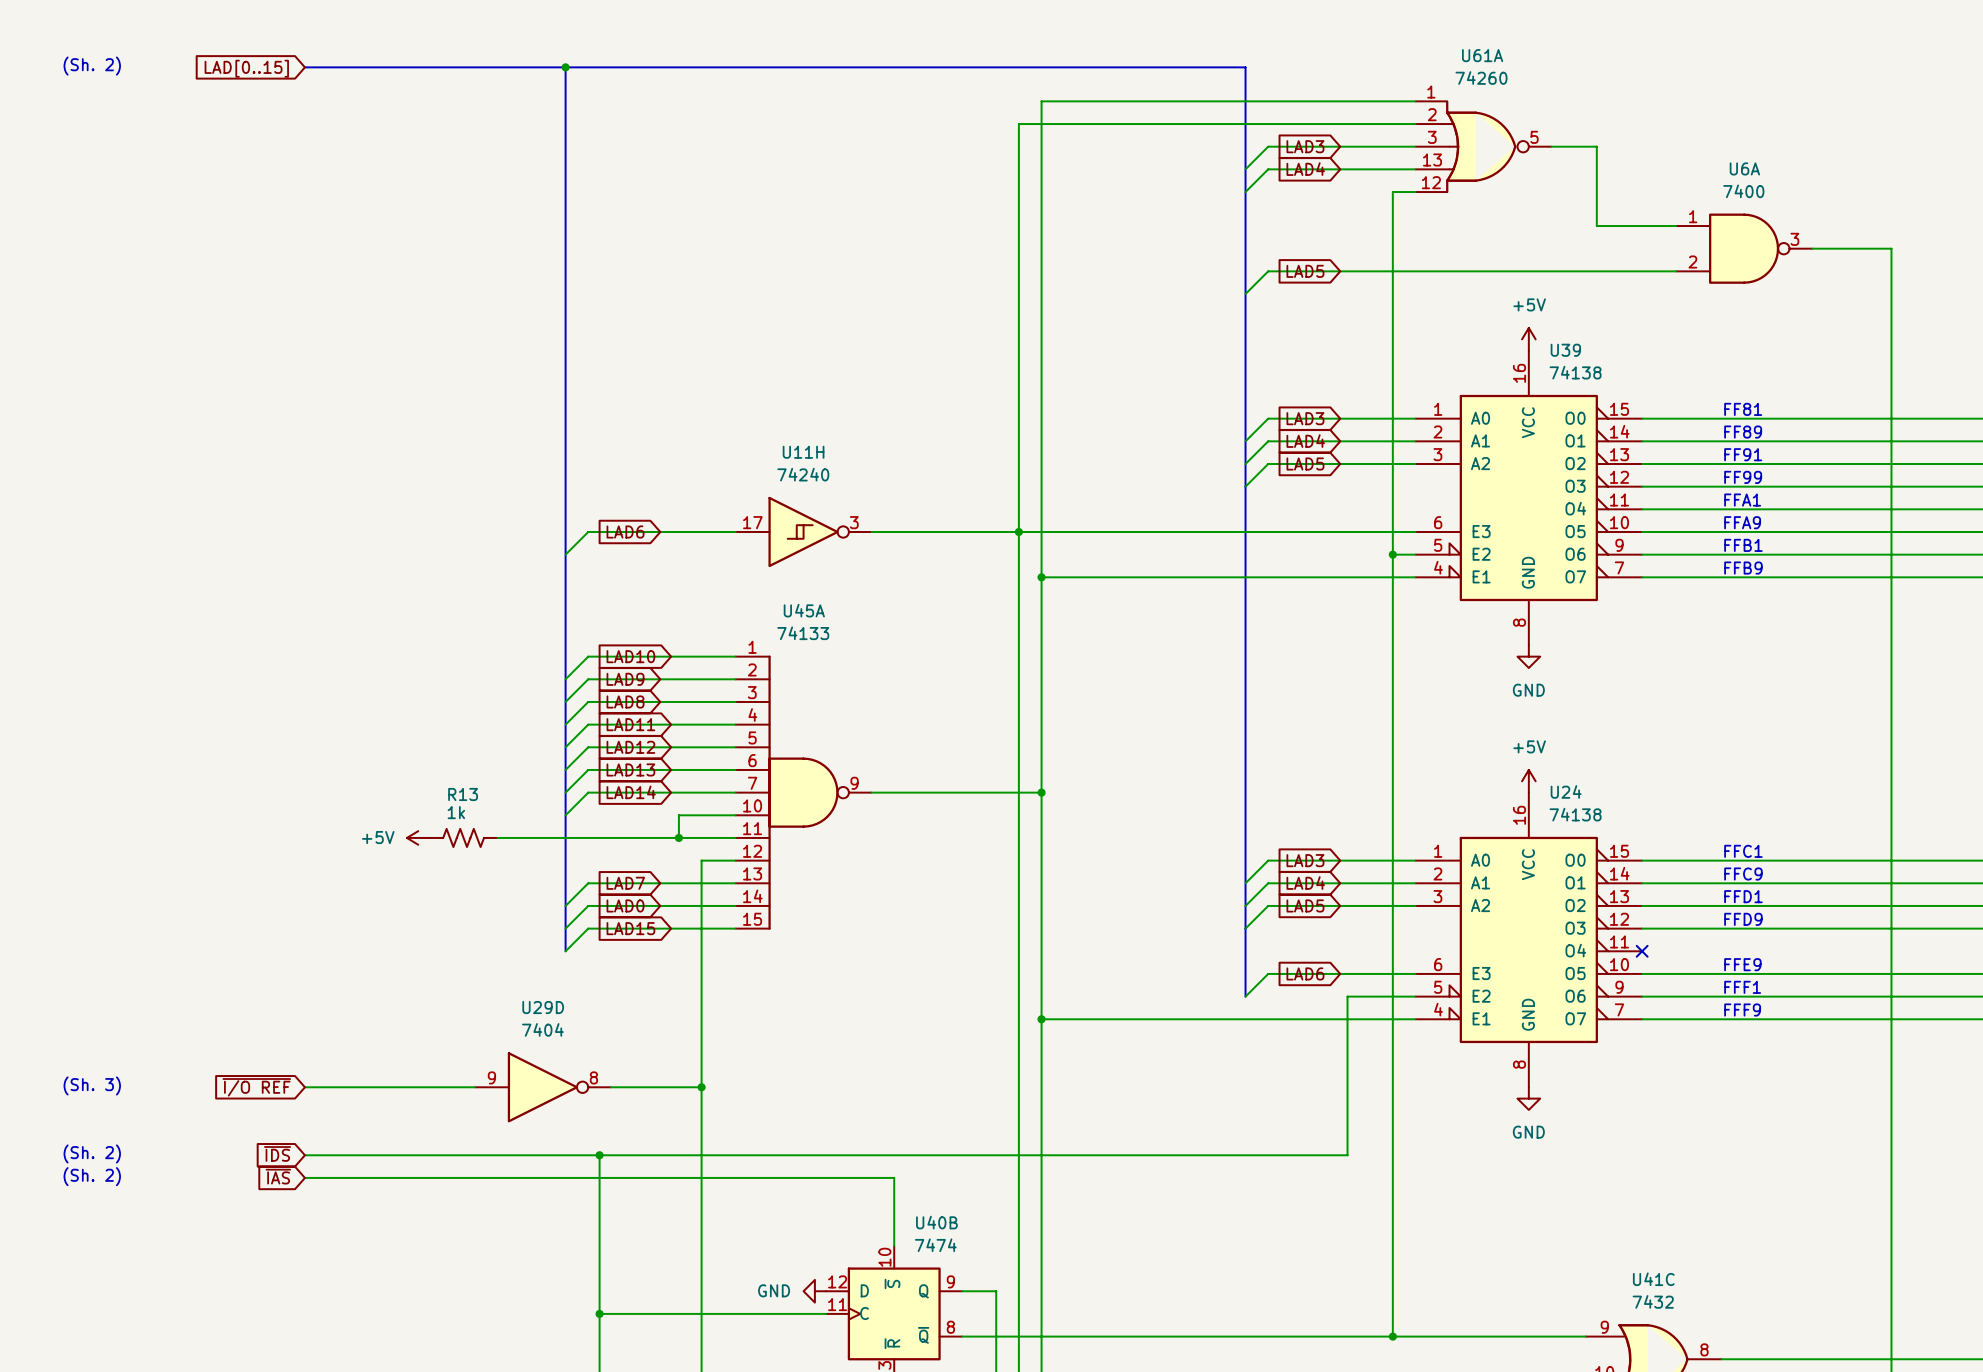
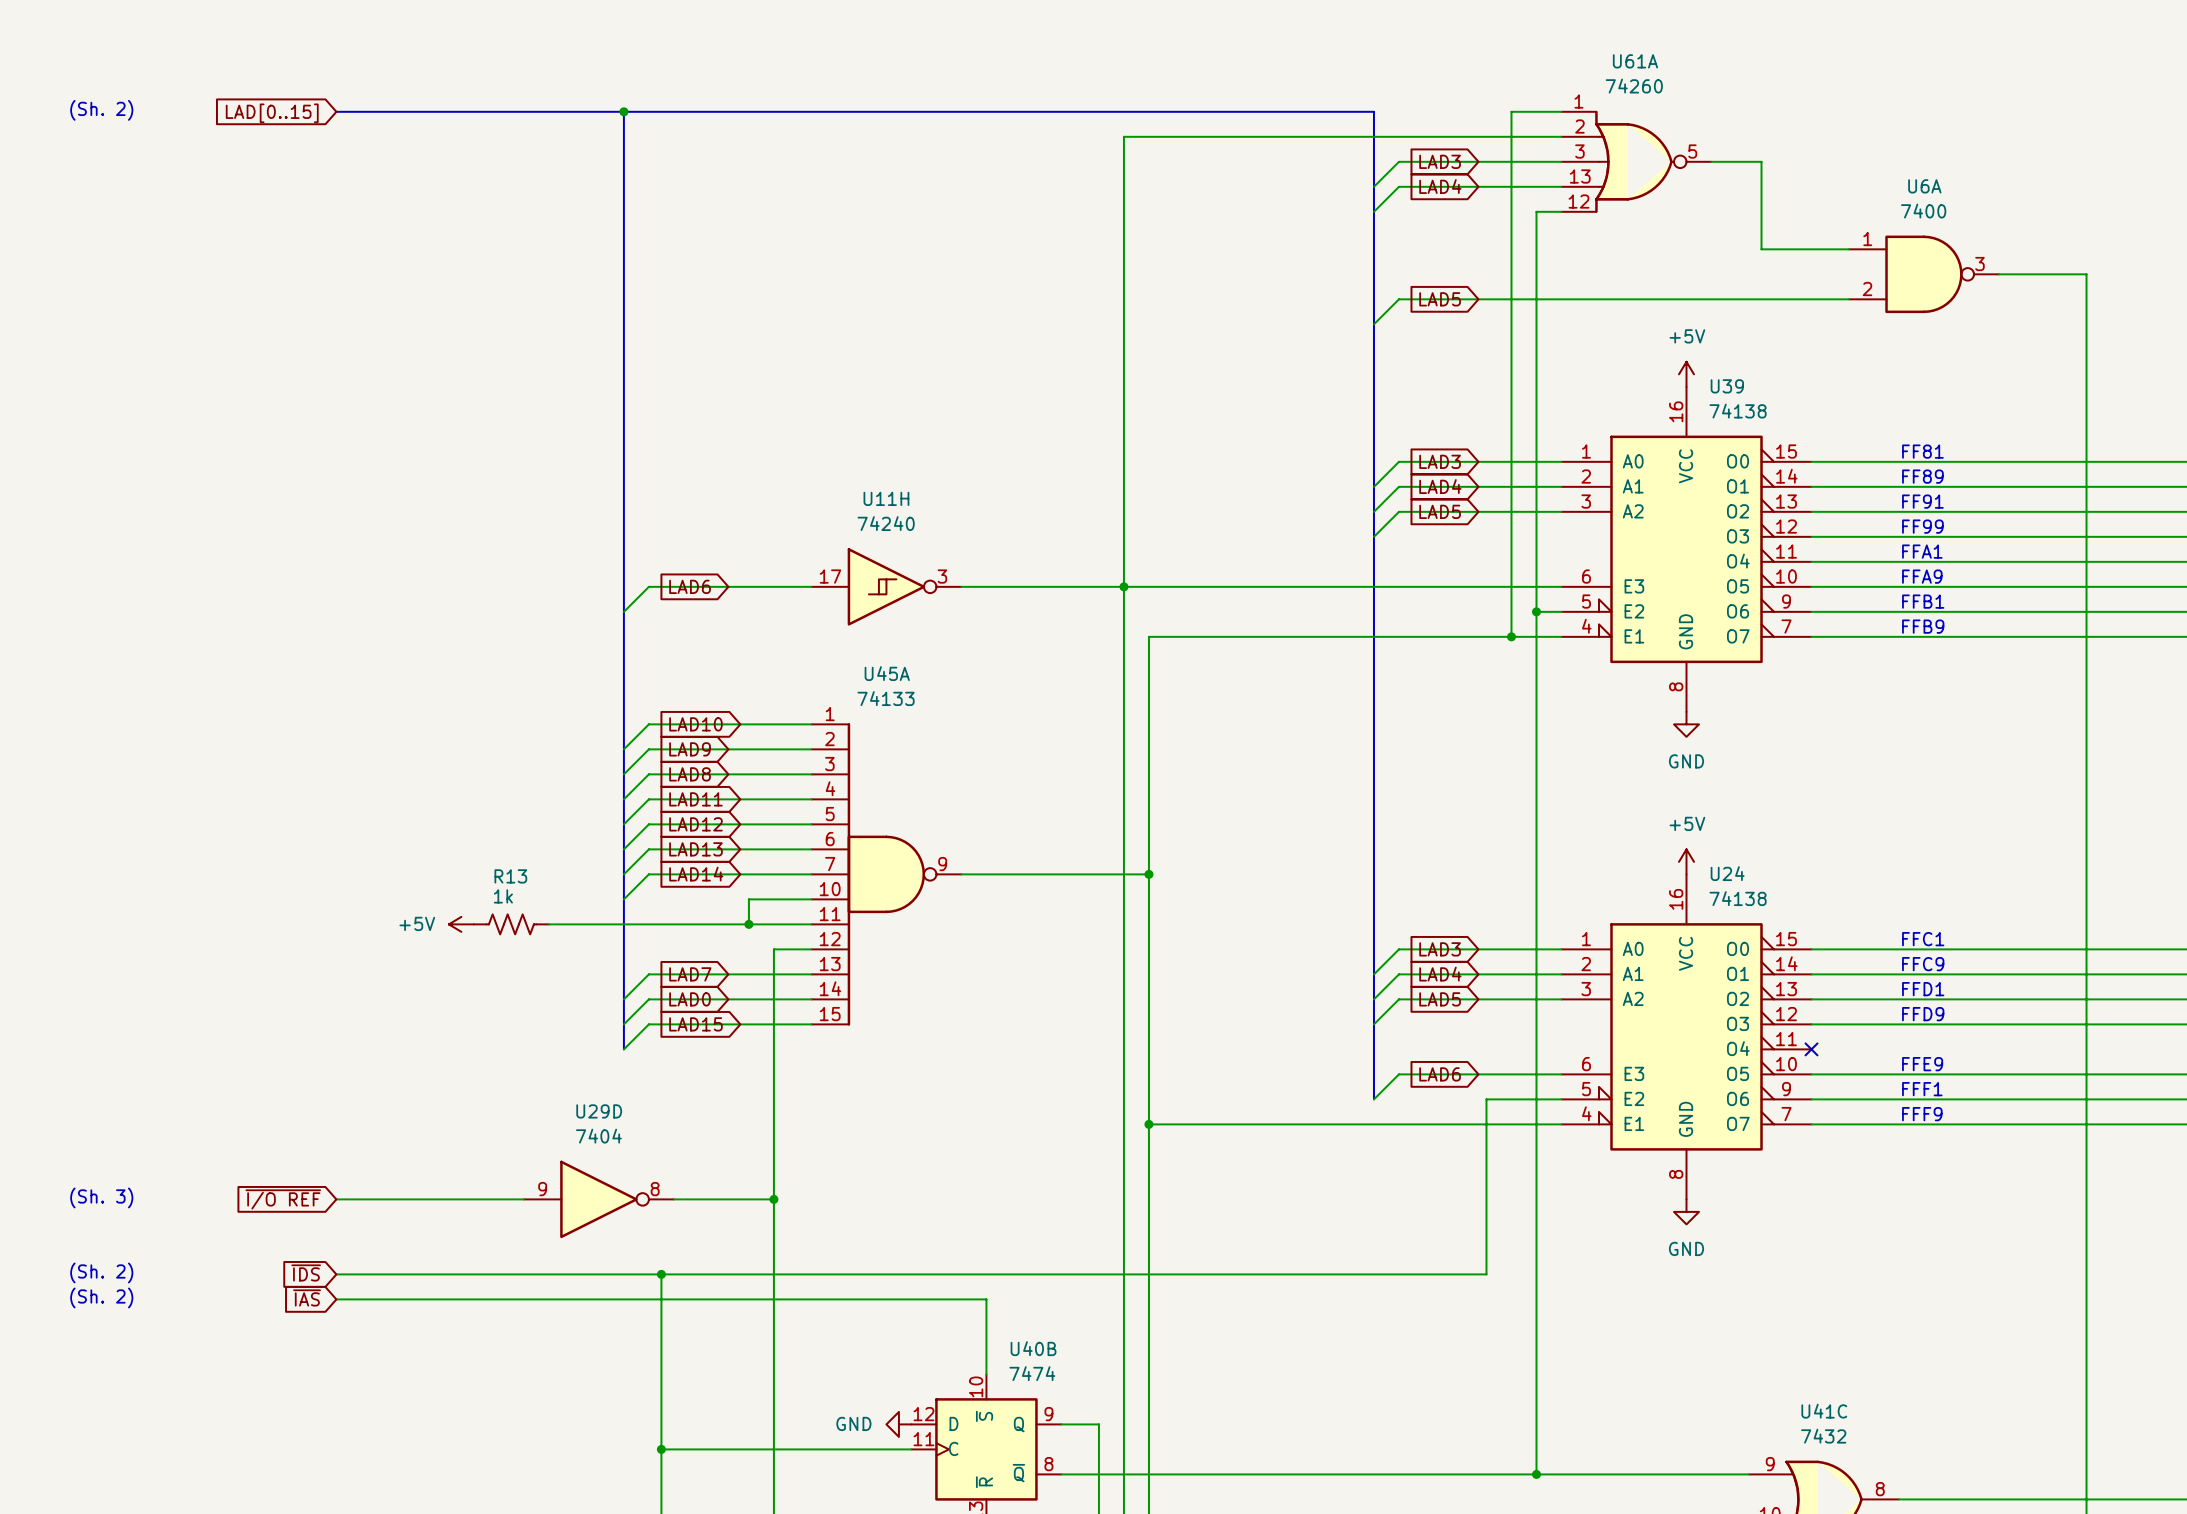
text position: (Sh. 2) (92, 66) -> (Sh. 2) (101, 110)
bus: (304, 67) (1245, 67) (1245, 101) -> (336, 111) (1373, 111)
bus: (565, 67) (565, 101) -> none
junction position: (565, 67) -> (623, 111)
global label position: LAD[0..15] (246, 68) -> LAD[0..15] (272, 113)
wire: (1370, 101) (1041, 101) (1041, 577) -> (1511, 111) (1511, 636)
junction: (1041, 577) -> none
junction: none -> (1511, 636)

